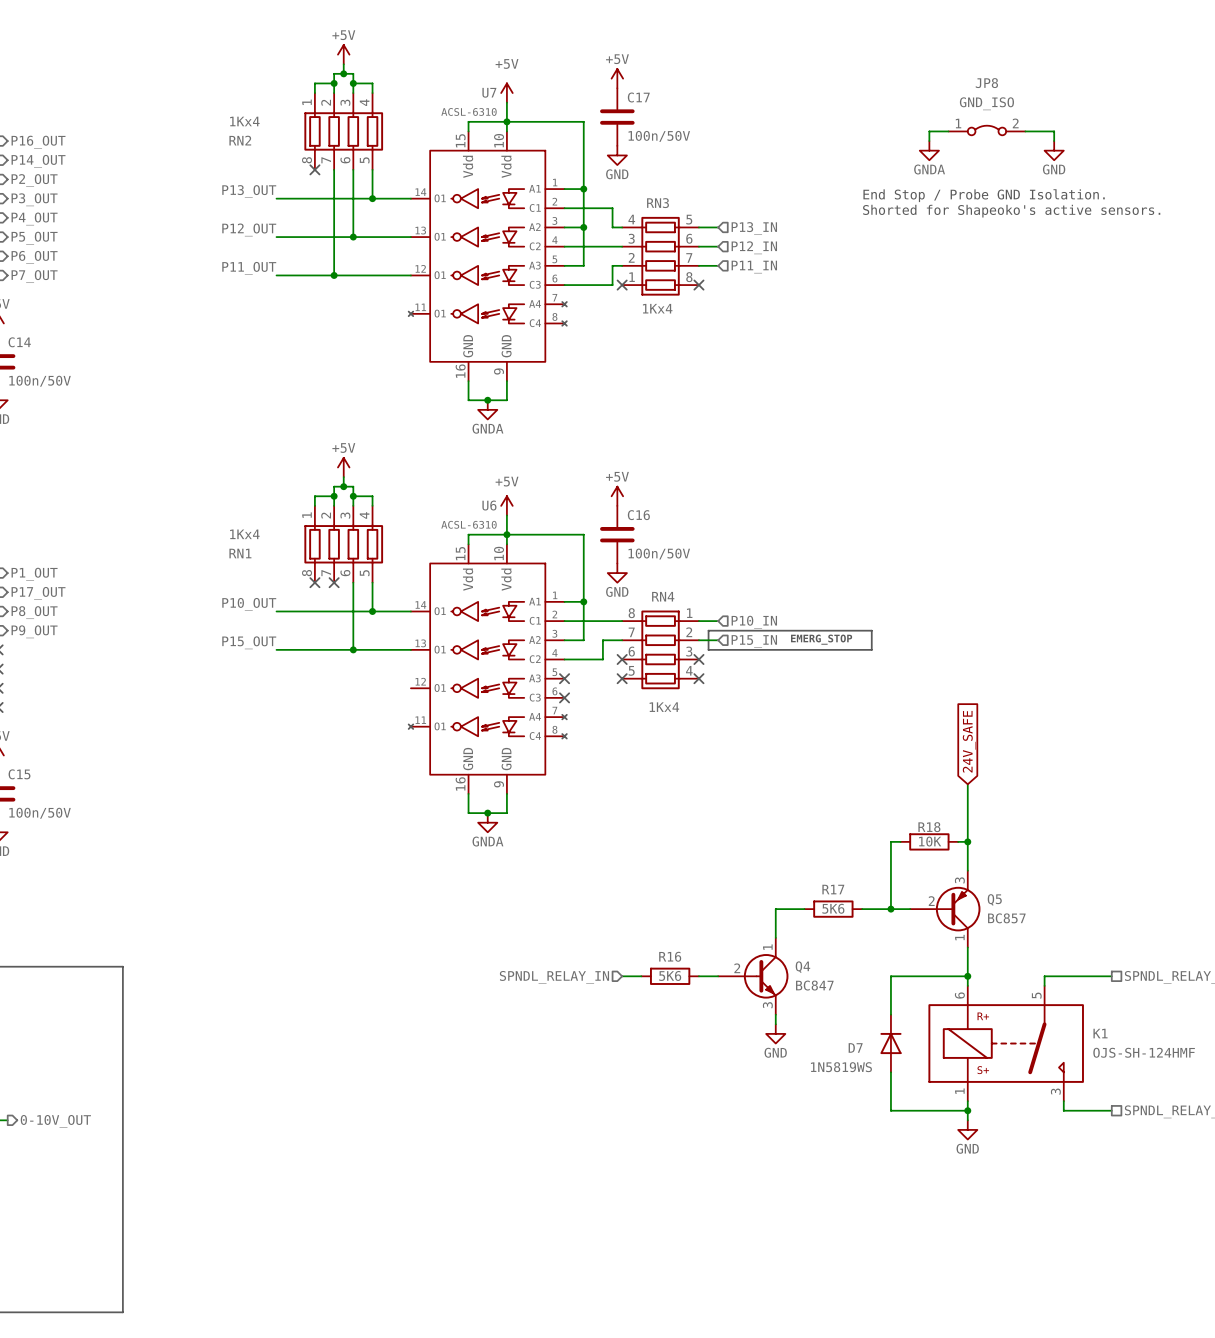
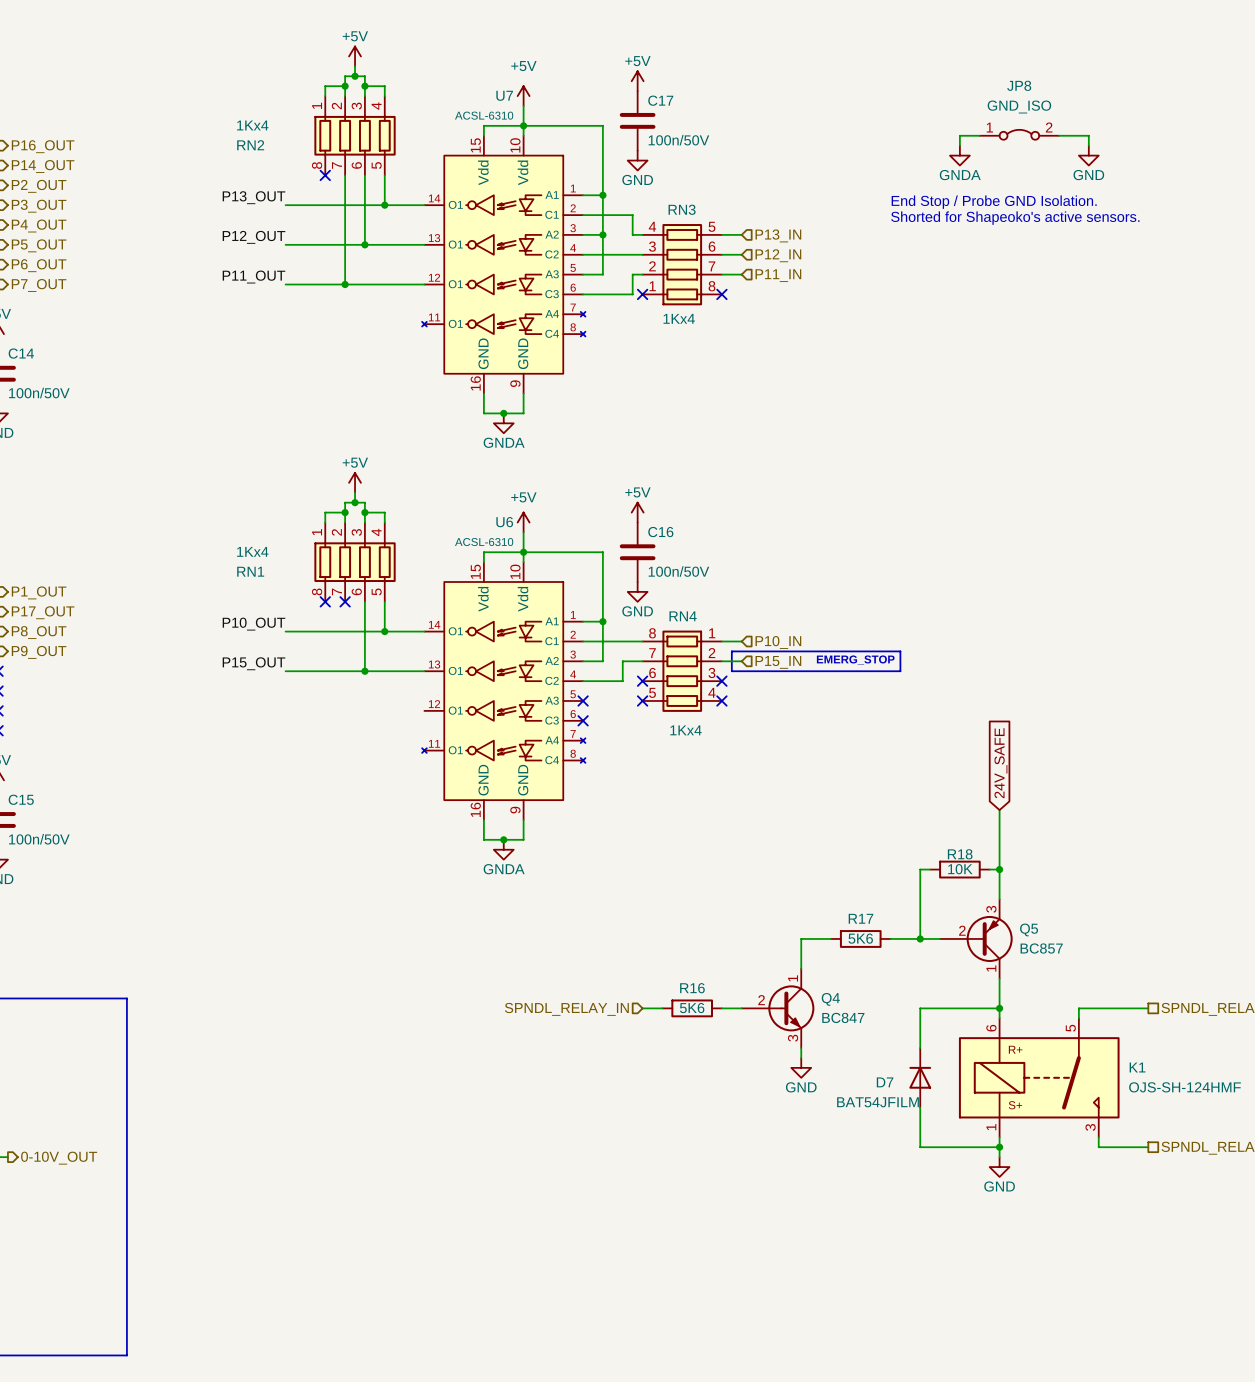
D7 value: 1N5819WS (841, 1067) -> BAT54JFILM (878, 1102)

